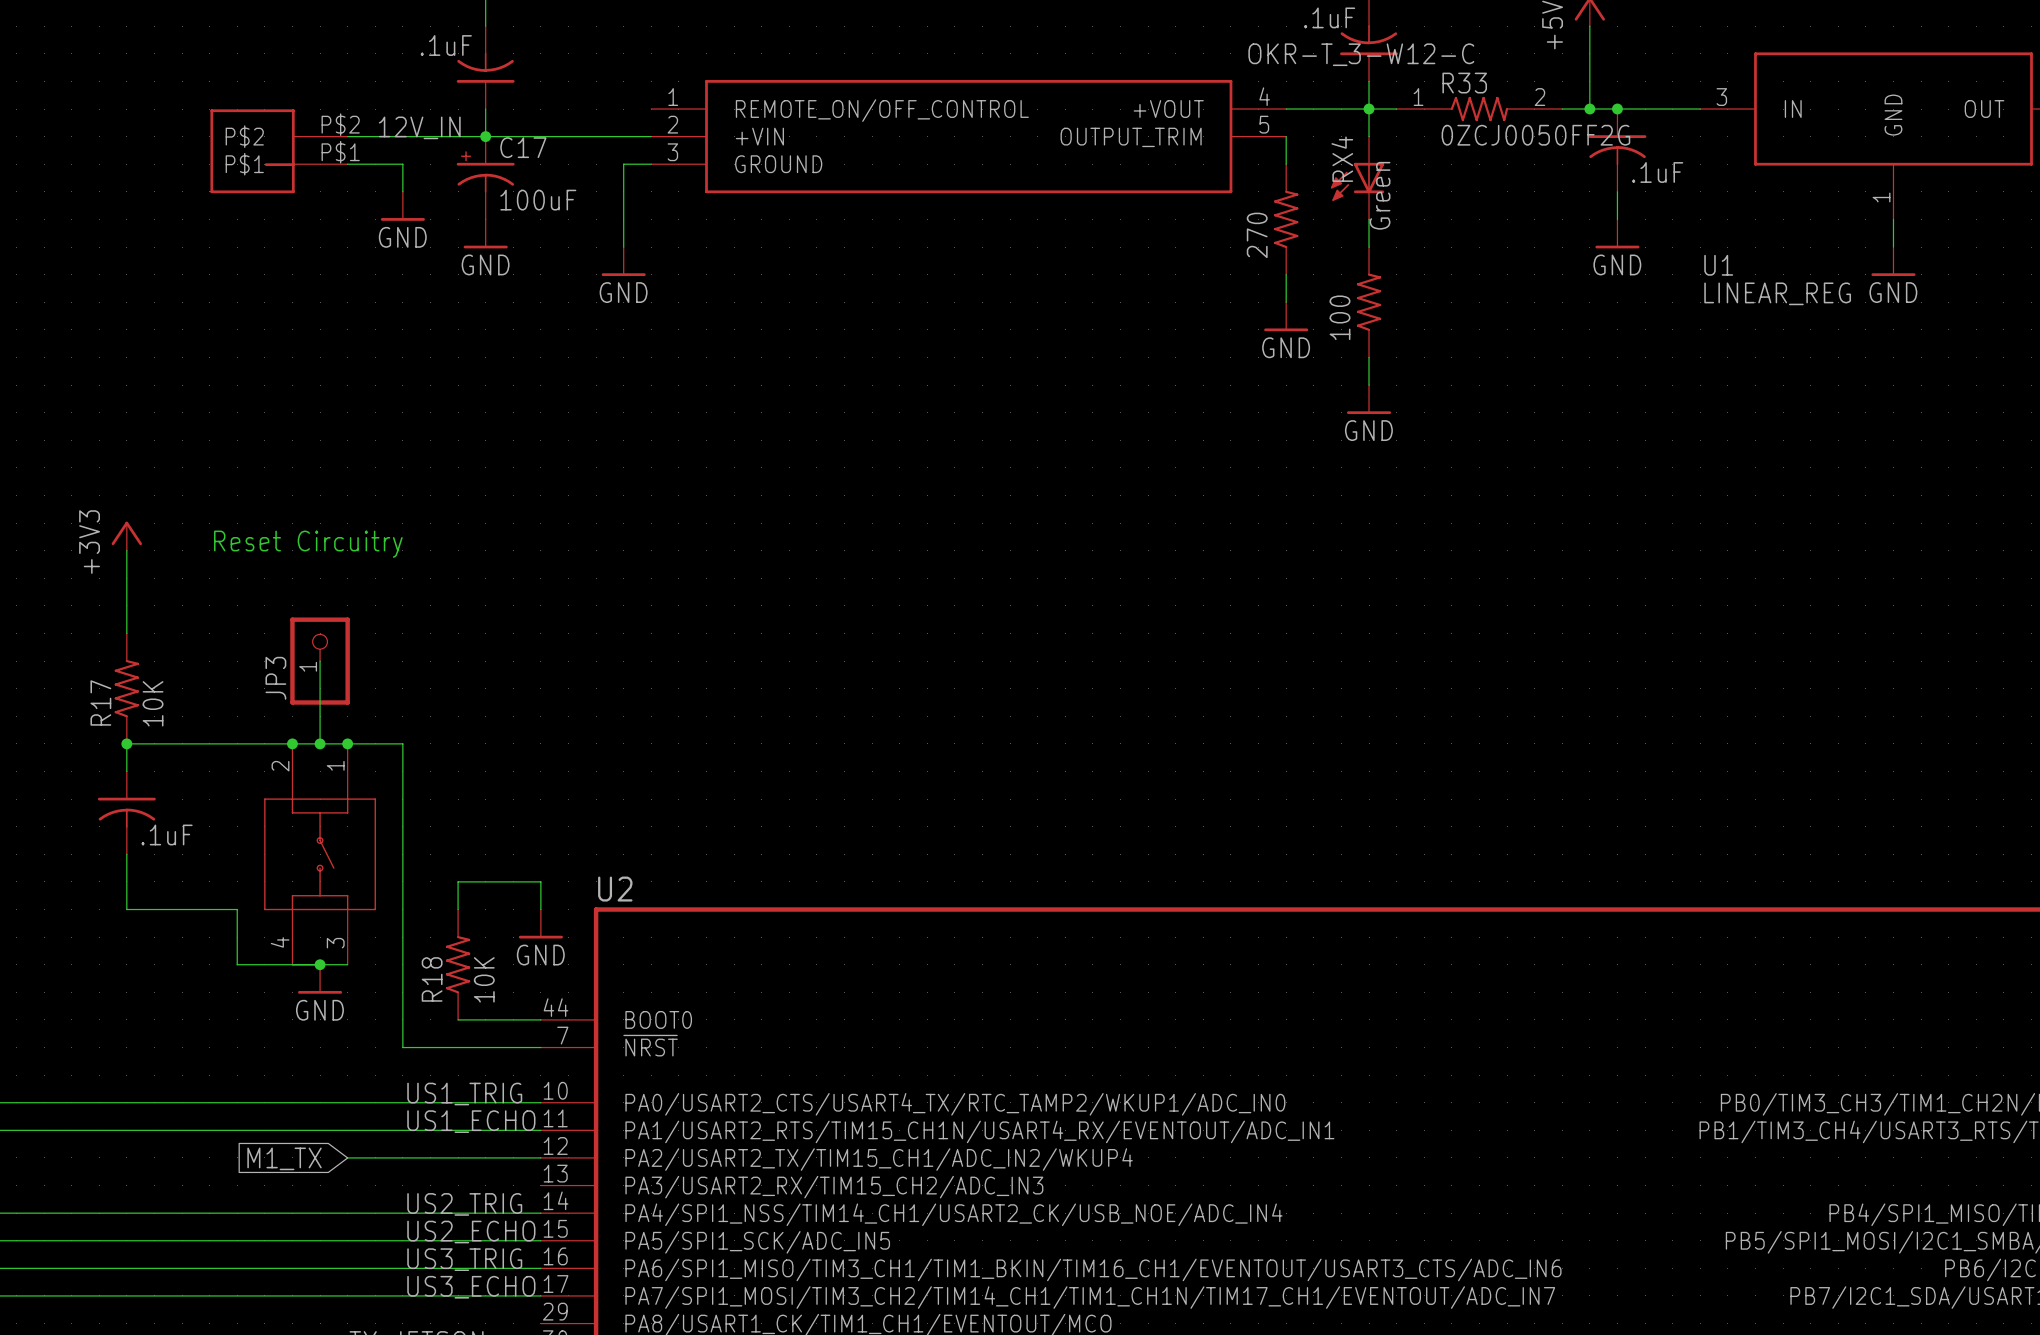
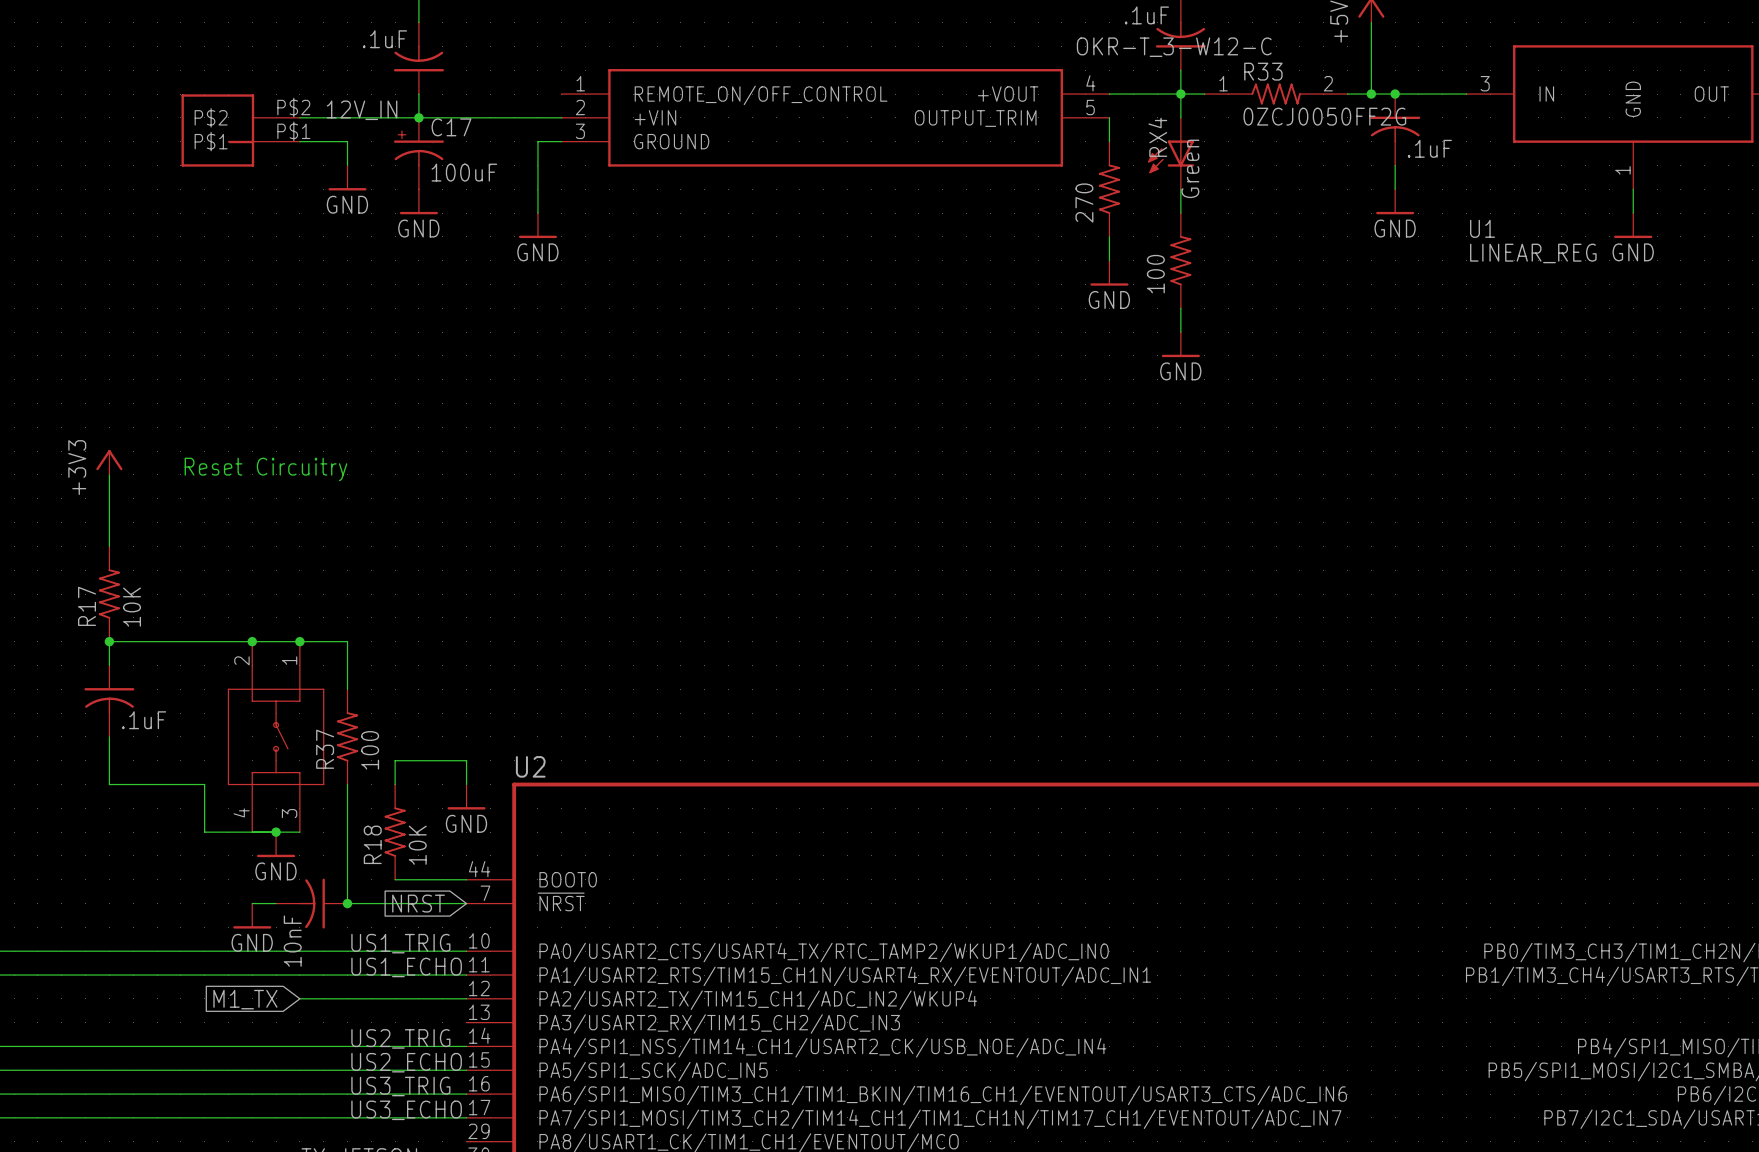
wire: (320, 661) (320, 743) -> none
JP3: (320, 661) -> none
junction: (320, 743) -> none
R37: none -> 100 (347, 736)
wire: none -> (252, 903) (276, 903)
part: none -> 10nF (311, 903)
junction: none -> (347, 903)
global label: none -> NRST (418, 903)
power symbol: none -> GND (252, 916)

